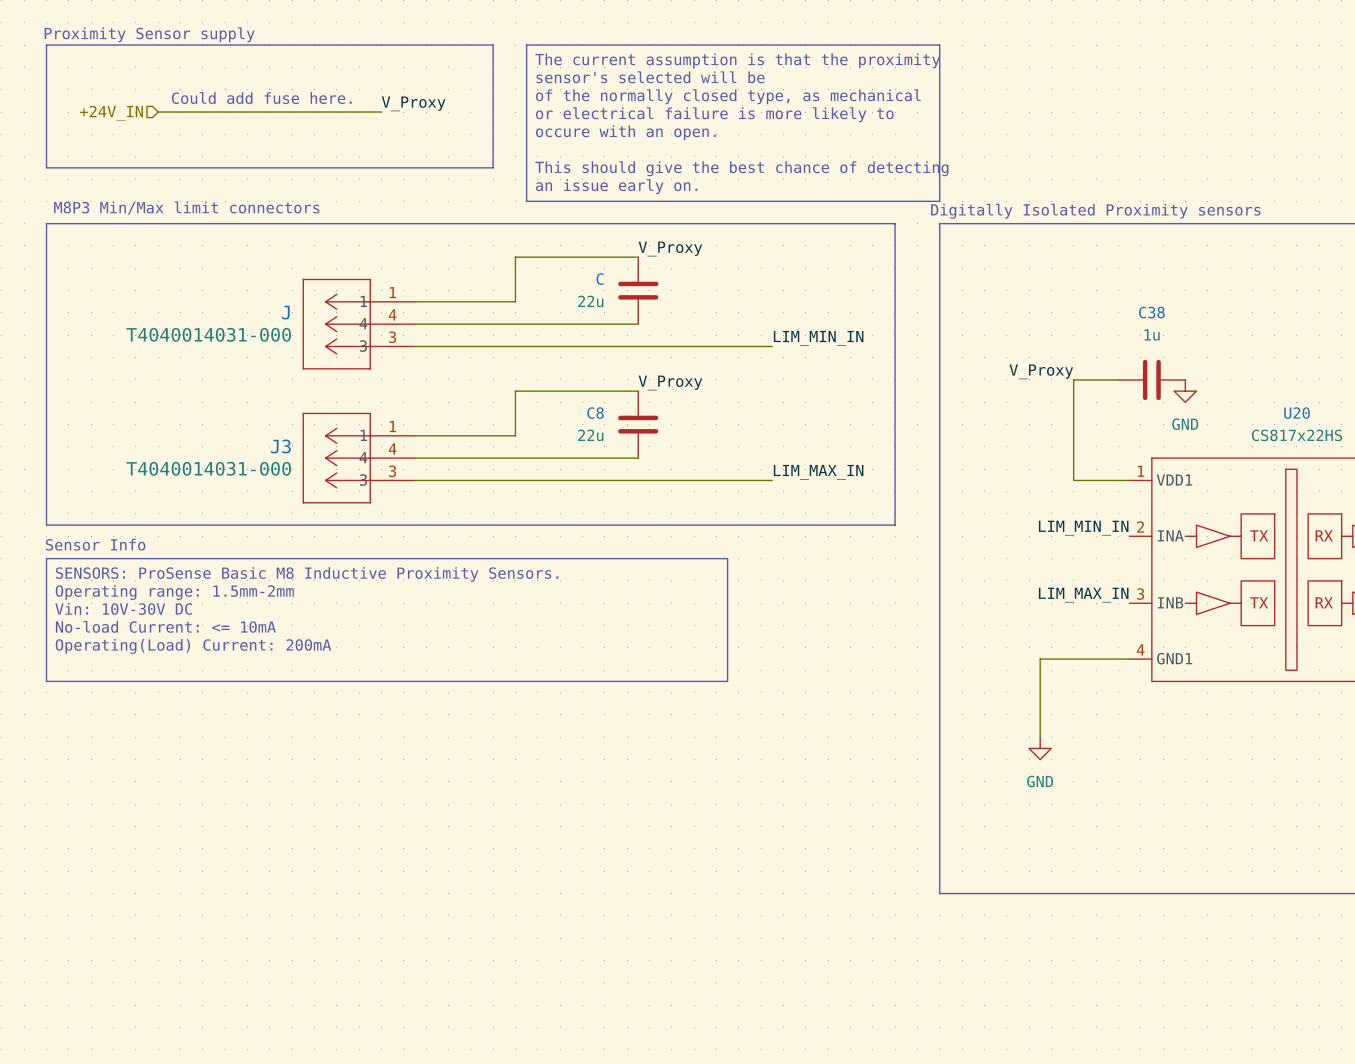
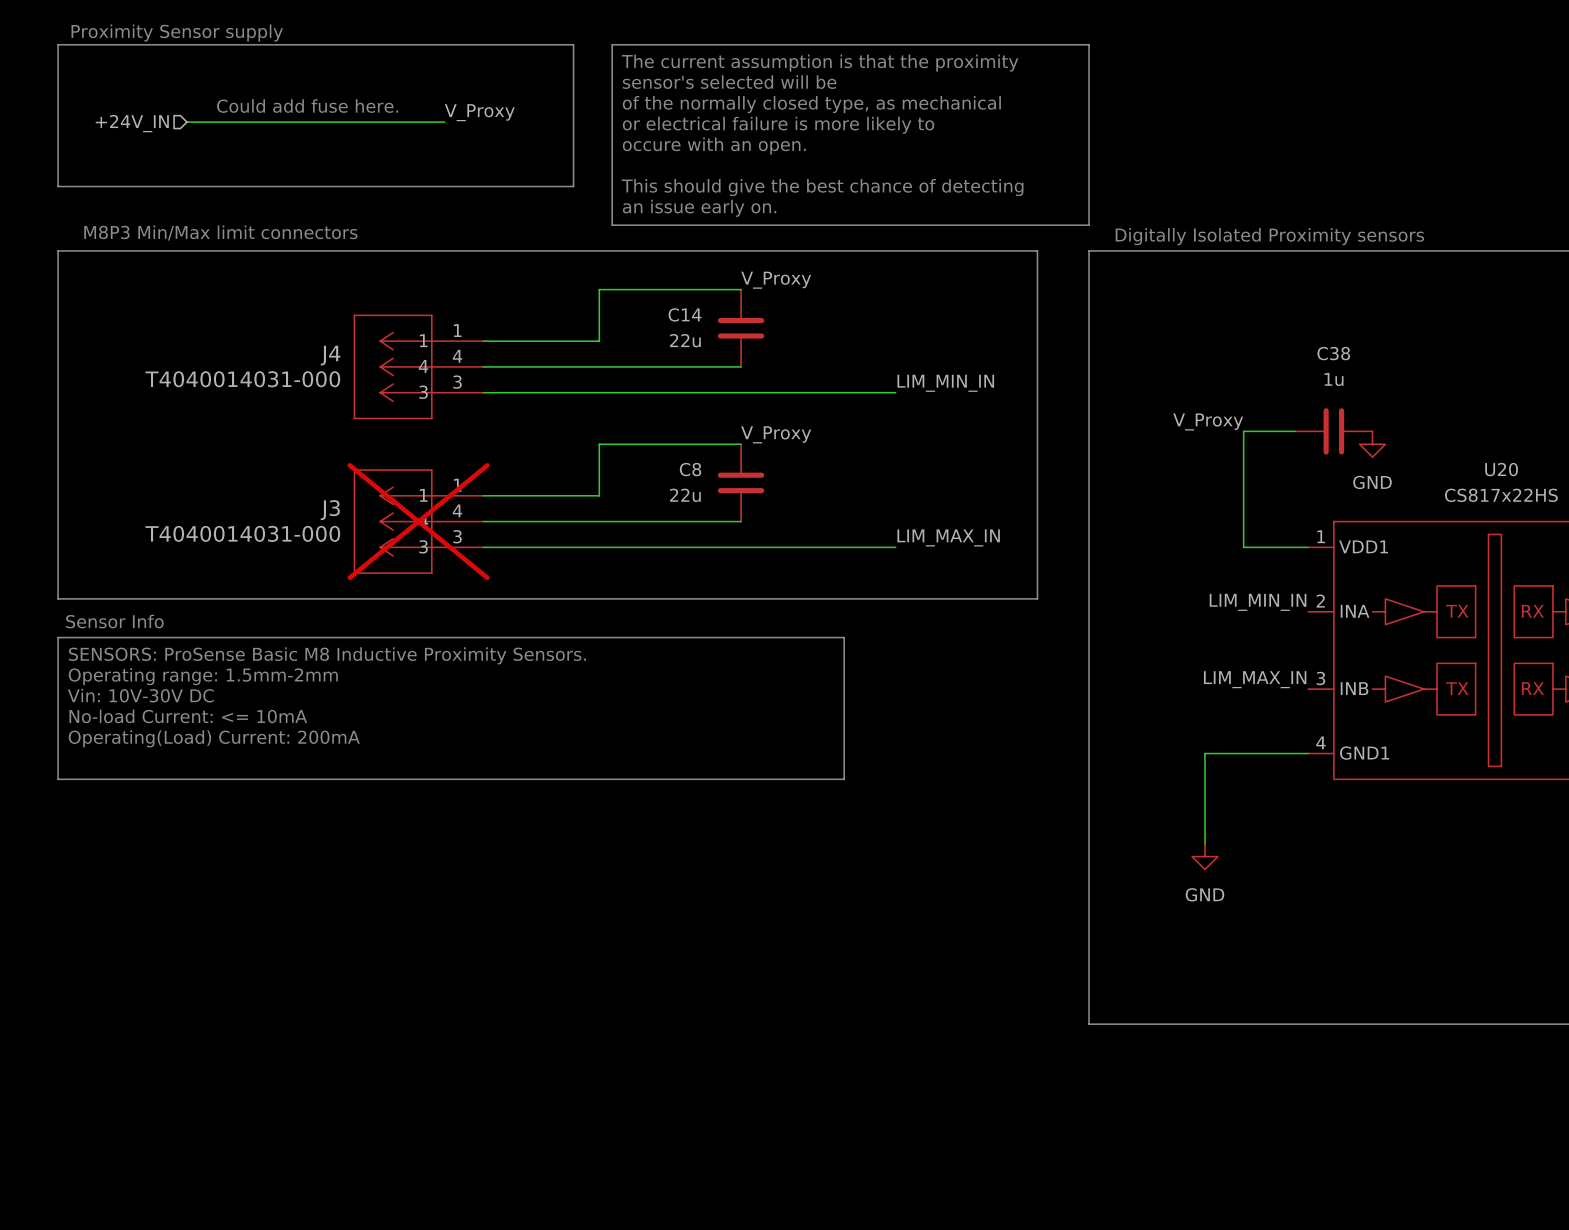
C name: C (600, 279) -> C14 (685, 314)
J name: J (285, 312) -> J4 (330, 355)
J3 do-not-place cross: none -> (418, 521)

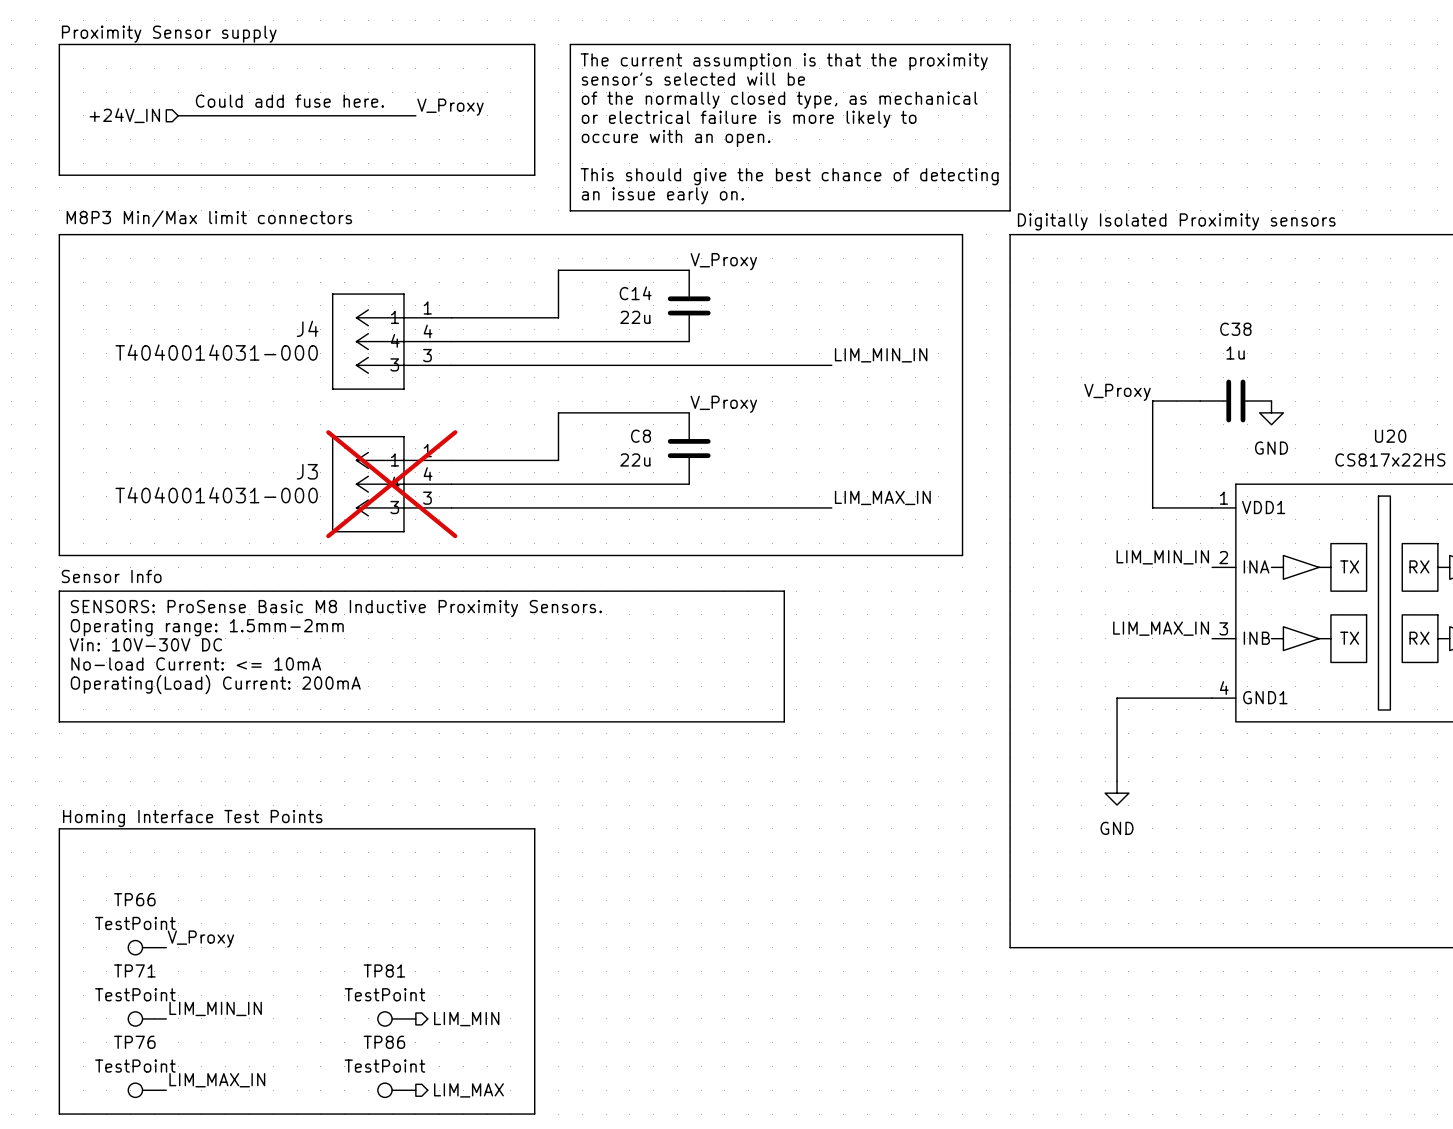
text: none -> Homing Interface Test Points (192, 818)
line: none -> (59, 828) (534, 828) (534, 1114) (59, 1114) (59, 828)
label: none -> V_Proxy (200, 939)
TP66: none -> TestPoint (147, 947)
label: none -> LIM_MIN_IN (215, 1008)
TP71: none -> TestPoint (147, 1018)
TP81: none -> TestPoint (396, 1018)
hierarchical label: none -> LIM_MIN (466, 1019)
label: none -> LIM_MAX_IN (217, 1080)
TP76: none -> TestPoint (147, 1090)
TP86: none -> TestPoint (396, 1090)
hierarchical label: none -> LIM_MAX (468, 1090)

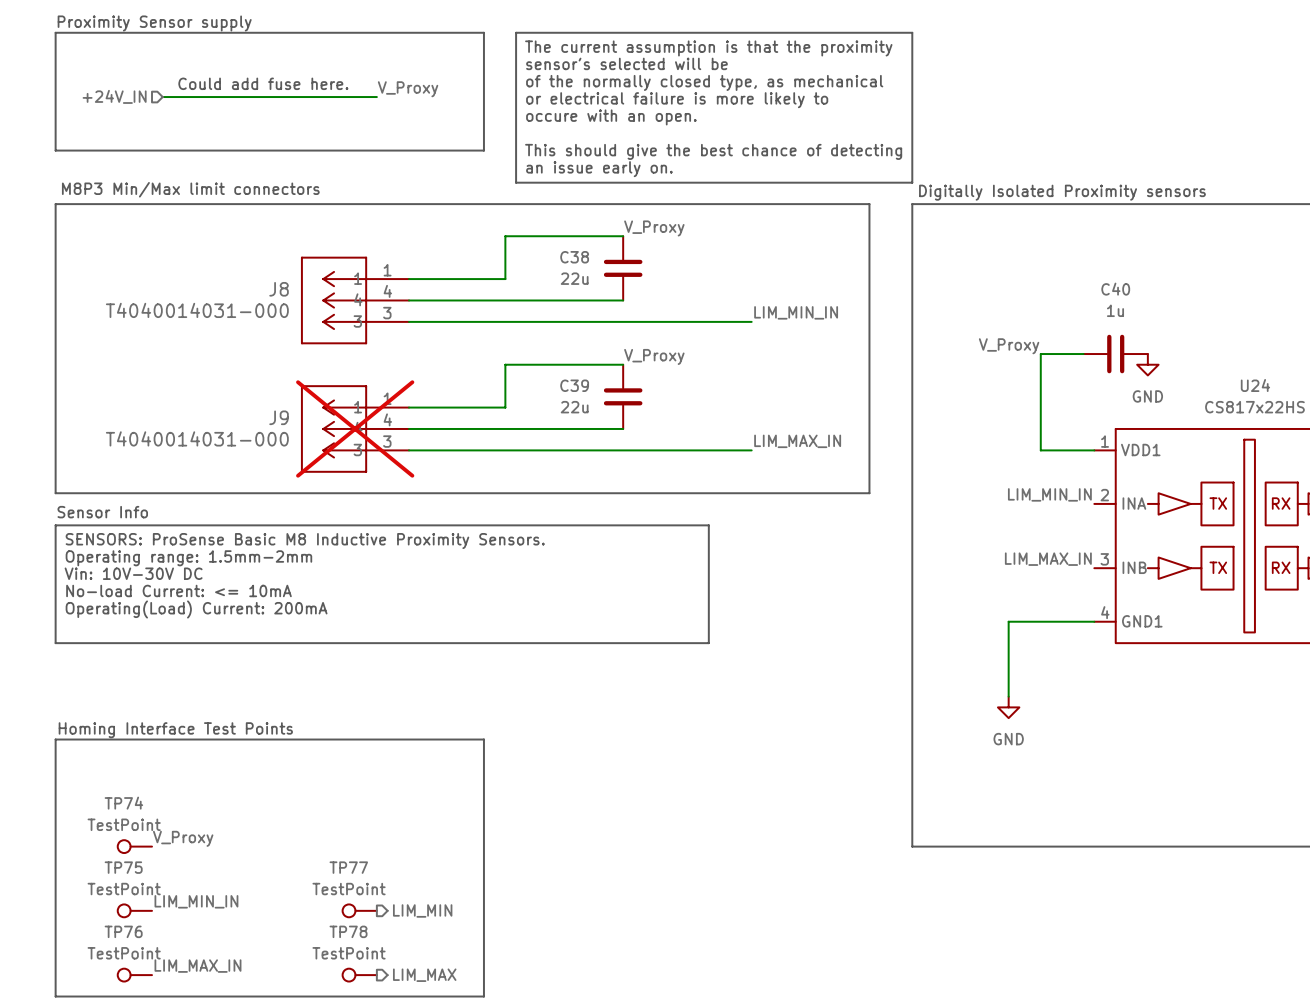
C14 name: C14 (635, 293) -> C38 (574, 257)
J4 name: J4 (307, 328) -> J8 (279, 289)
C38 name: C38 (1235, 329) -> C40 (1115, 289)
C8 name: C8 (641, 436) -> C39 (574, 385)
U20 name: U20 (1390, 436) -> U24 (1255, 385)
J3 name: J3 (307, 471) -> J9 (279, 417)
TP66 name: TP66 (134, 899) -> TP74 (123, 803)
TP71 name: TP71 (134, 970) -> TP75 (123, 867)
TP81 name: TP81 (384, 970) -> TP77 (348, 867)
TP86 name: TP86 (384, 1042) -> TP78 (348, 931)

